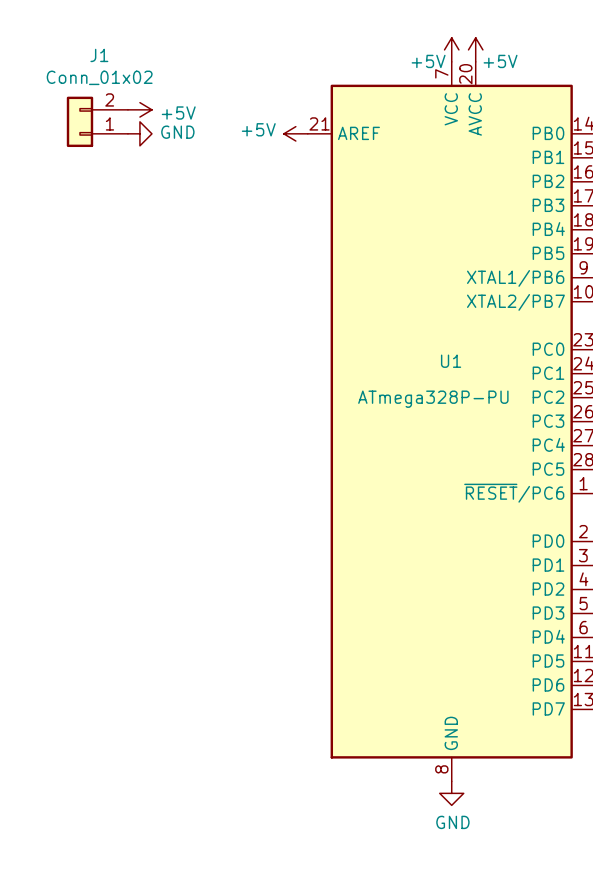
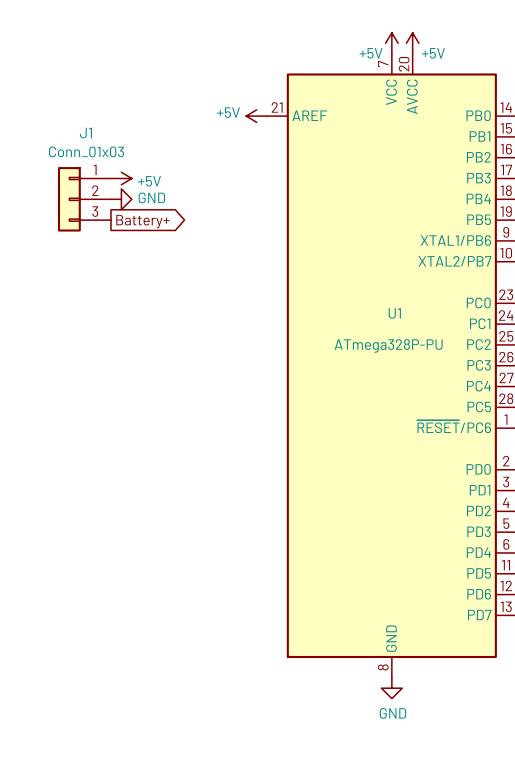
J1 value: Conn_01x02 (99, 77) -> Conn_01x03 (86, 151)
J1 symbol: [66, 96, 128, 148] -> [57, 167, 112, 232]
power symbol position: +5V (139, 109) -> +5V (121, 178)
power symbol position: GND (139, 133) -> GND (121, 199)
global label: none -> Battery+ (142, 221)

